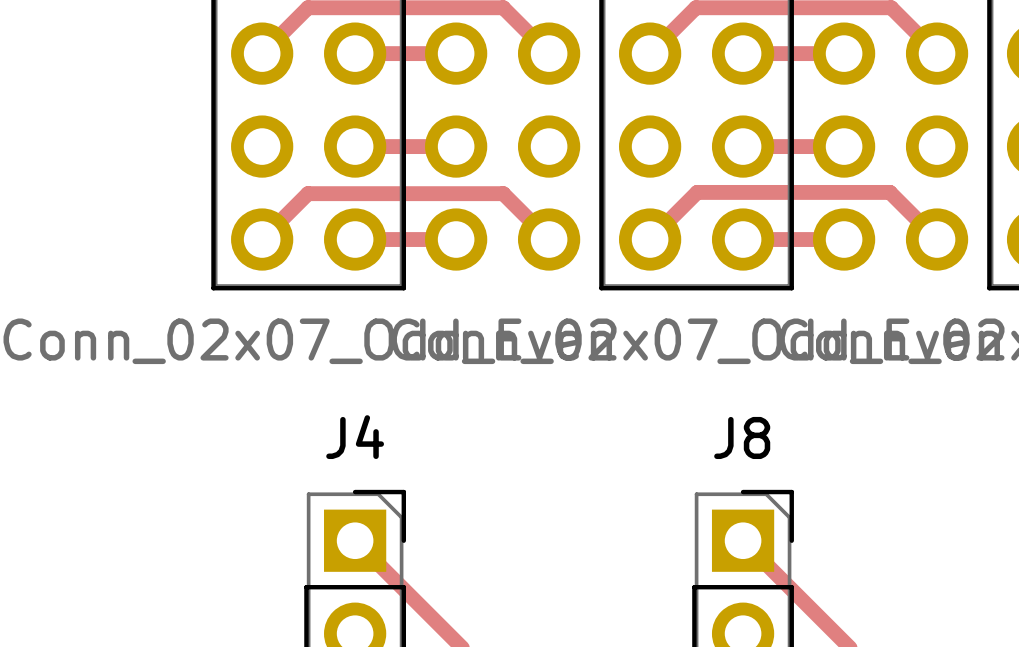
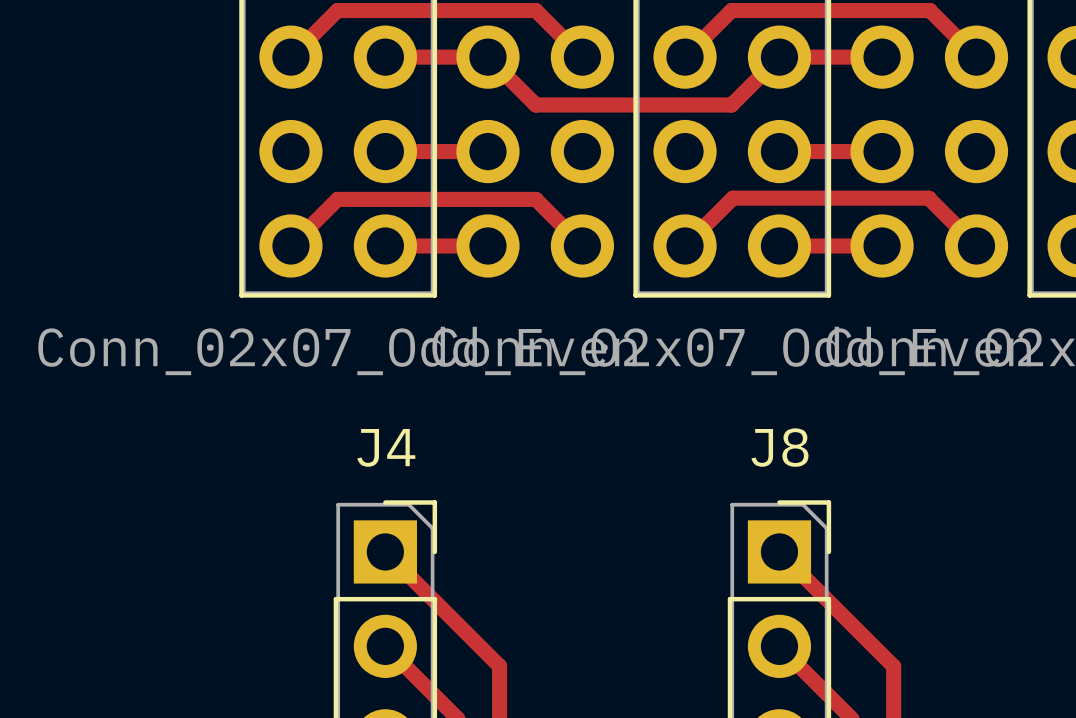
track: none -> (487, 57) (535, 104) (731, 104) (779, 57)

